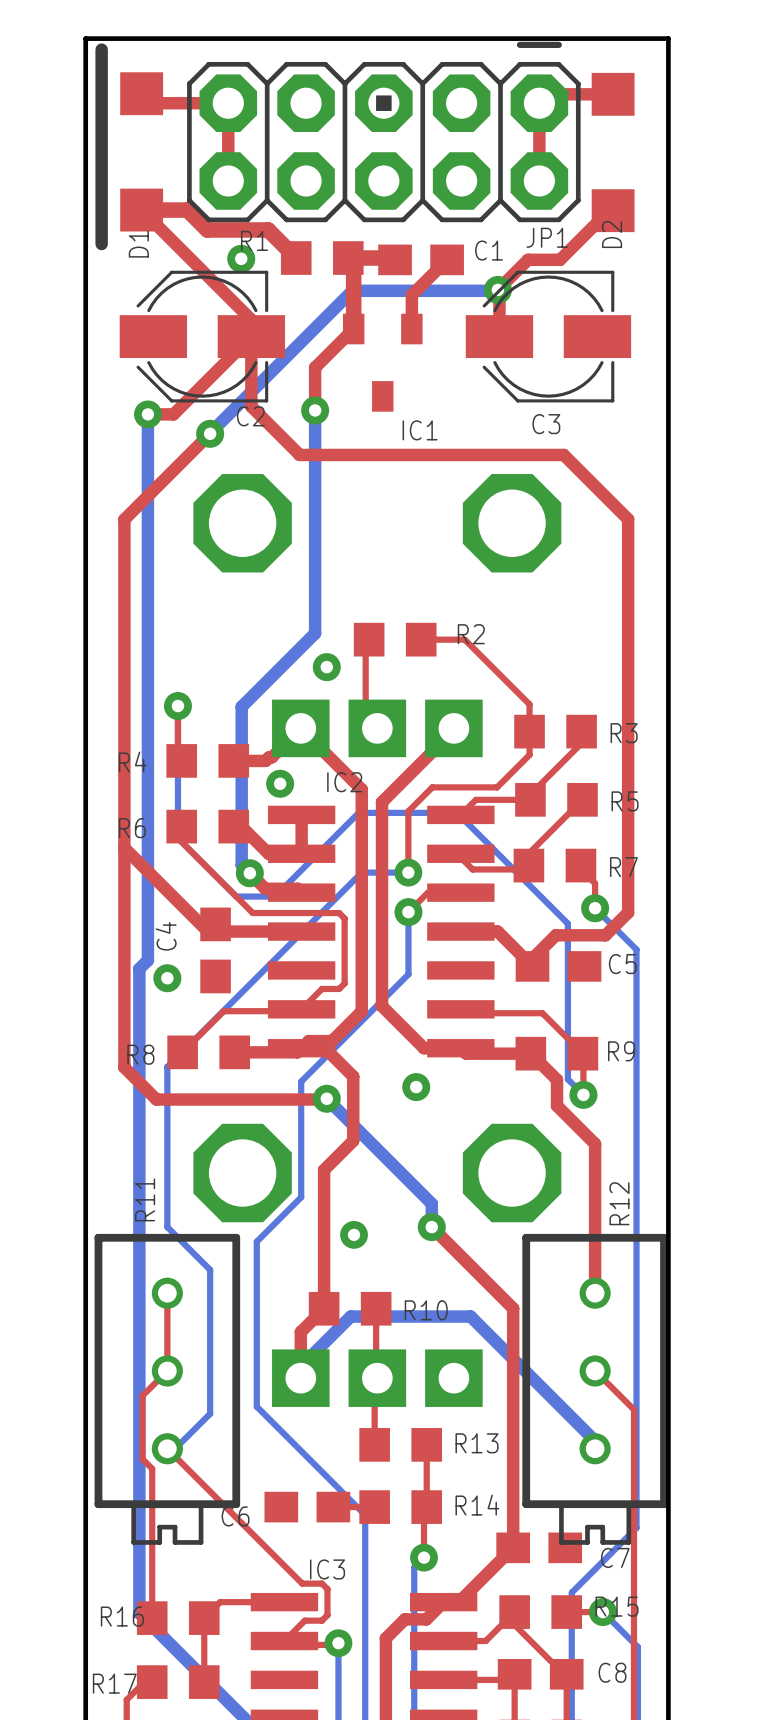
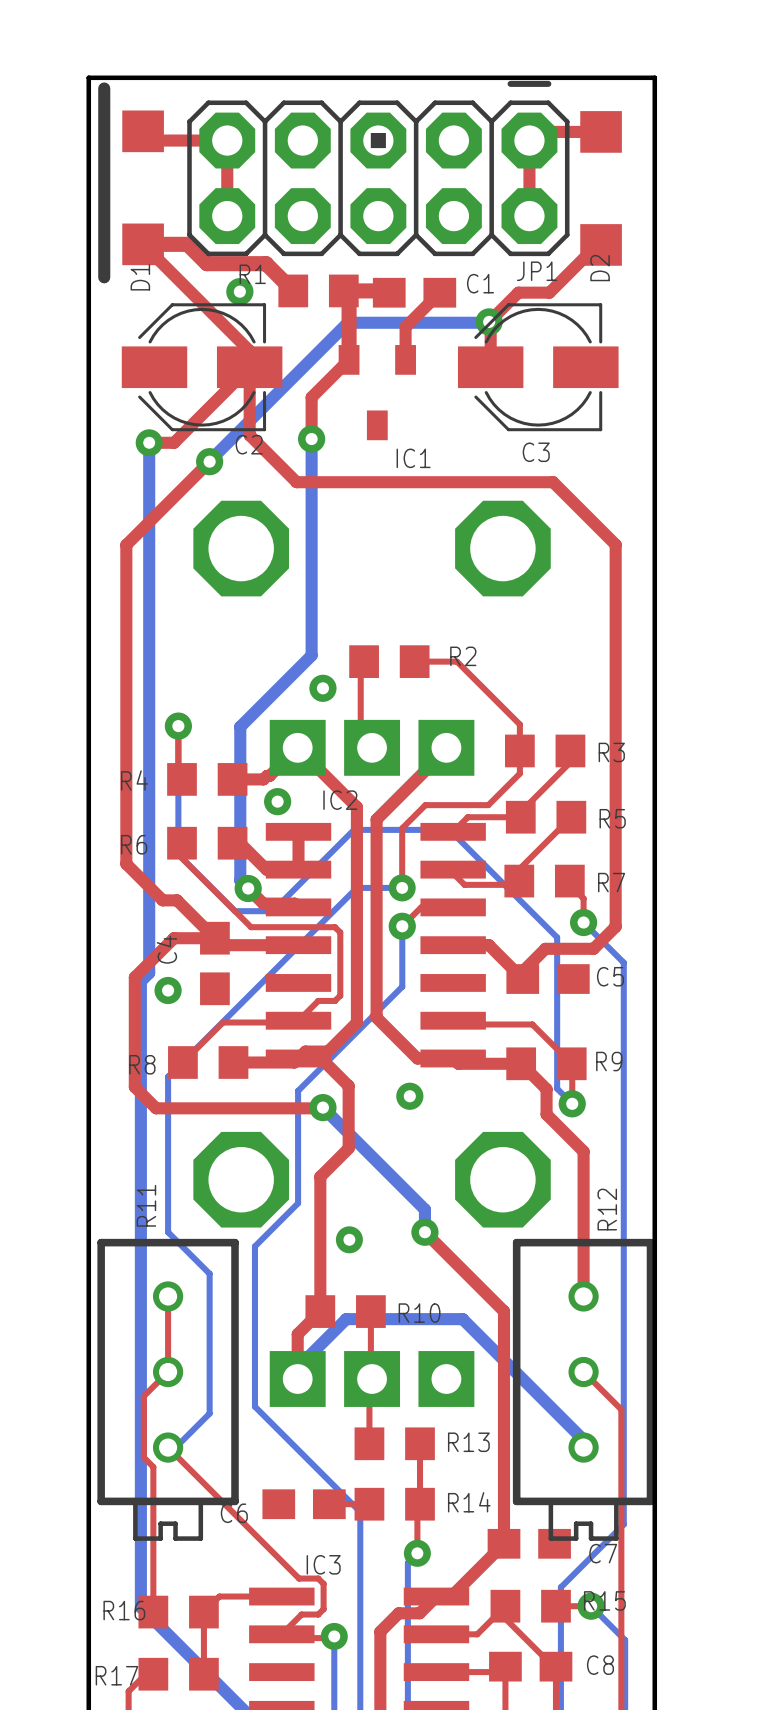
top track: (124, 847) (124, 1067) (156, 1099) -> (162, 900) (177, 900) (214, 938) (173, 938) (134, 977) (134, 1087) (157, 1108)
top track: (161, 885) (208, 931) (222, 931) -> none

